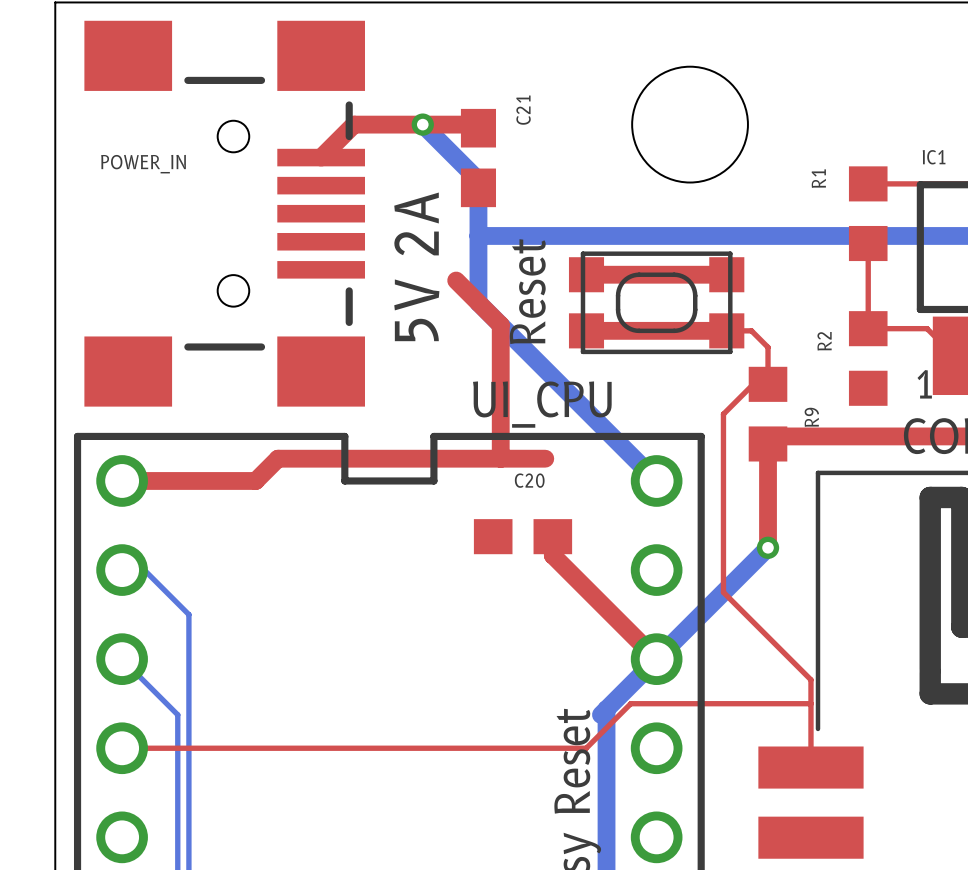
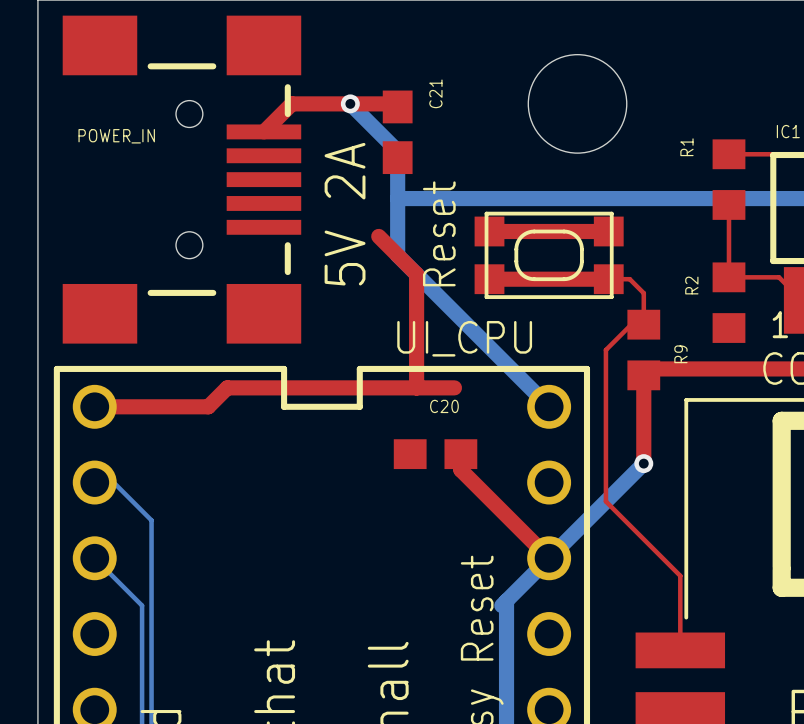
top track: (810, 703) (630, 703) (586, 748) (122, 748) -> none

